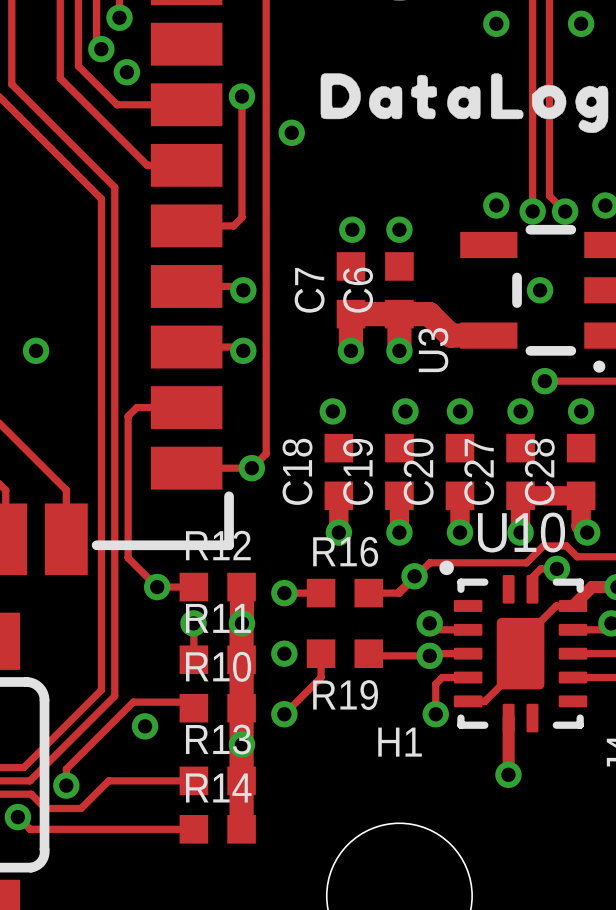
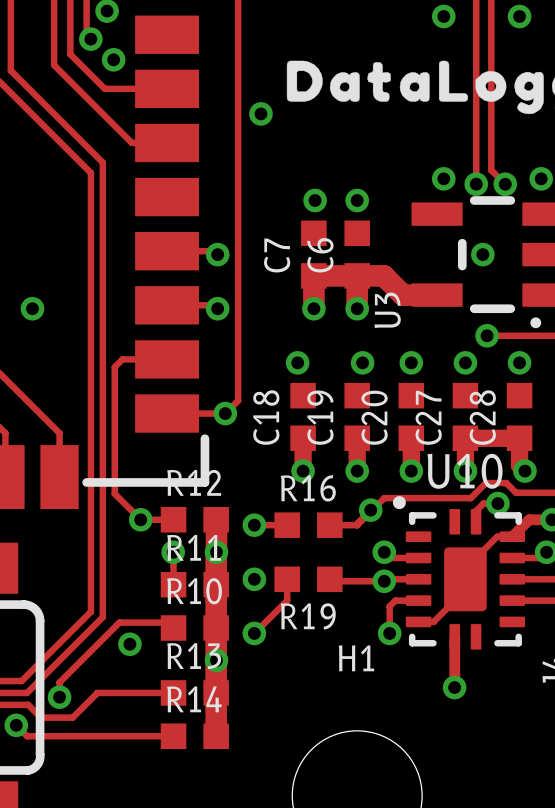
track: (241, 96) (241, 217) (233, 225) (186, 225) -> none
via: (241, 96) -> none

